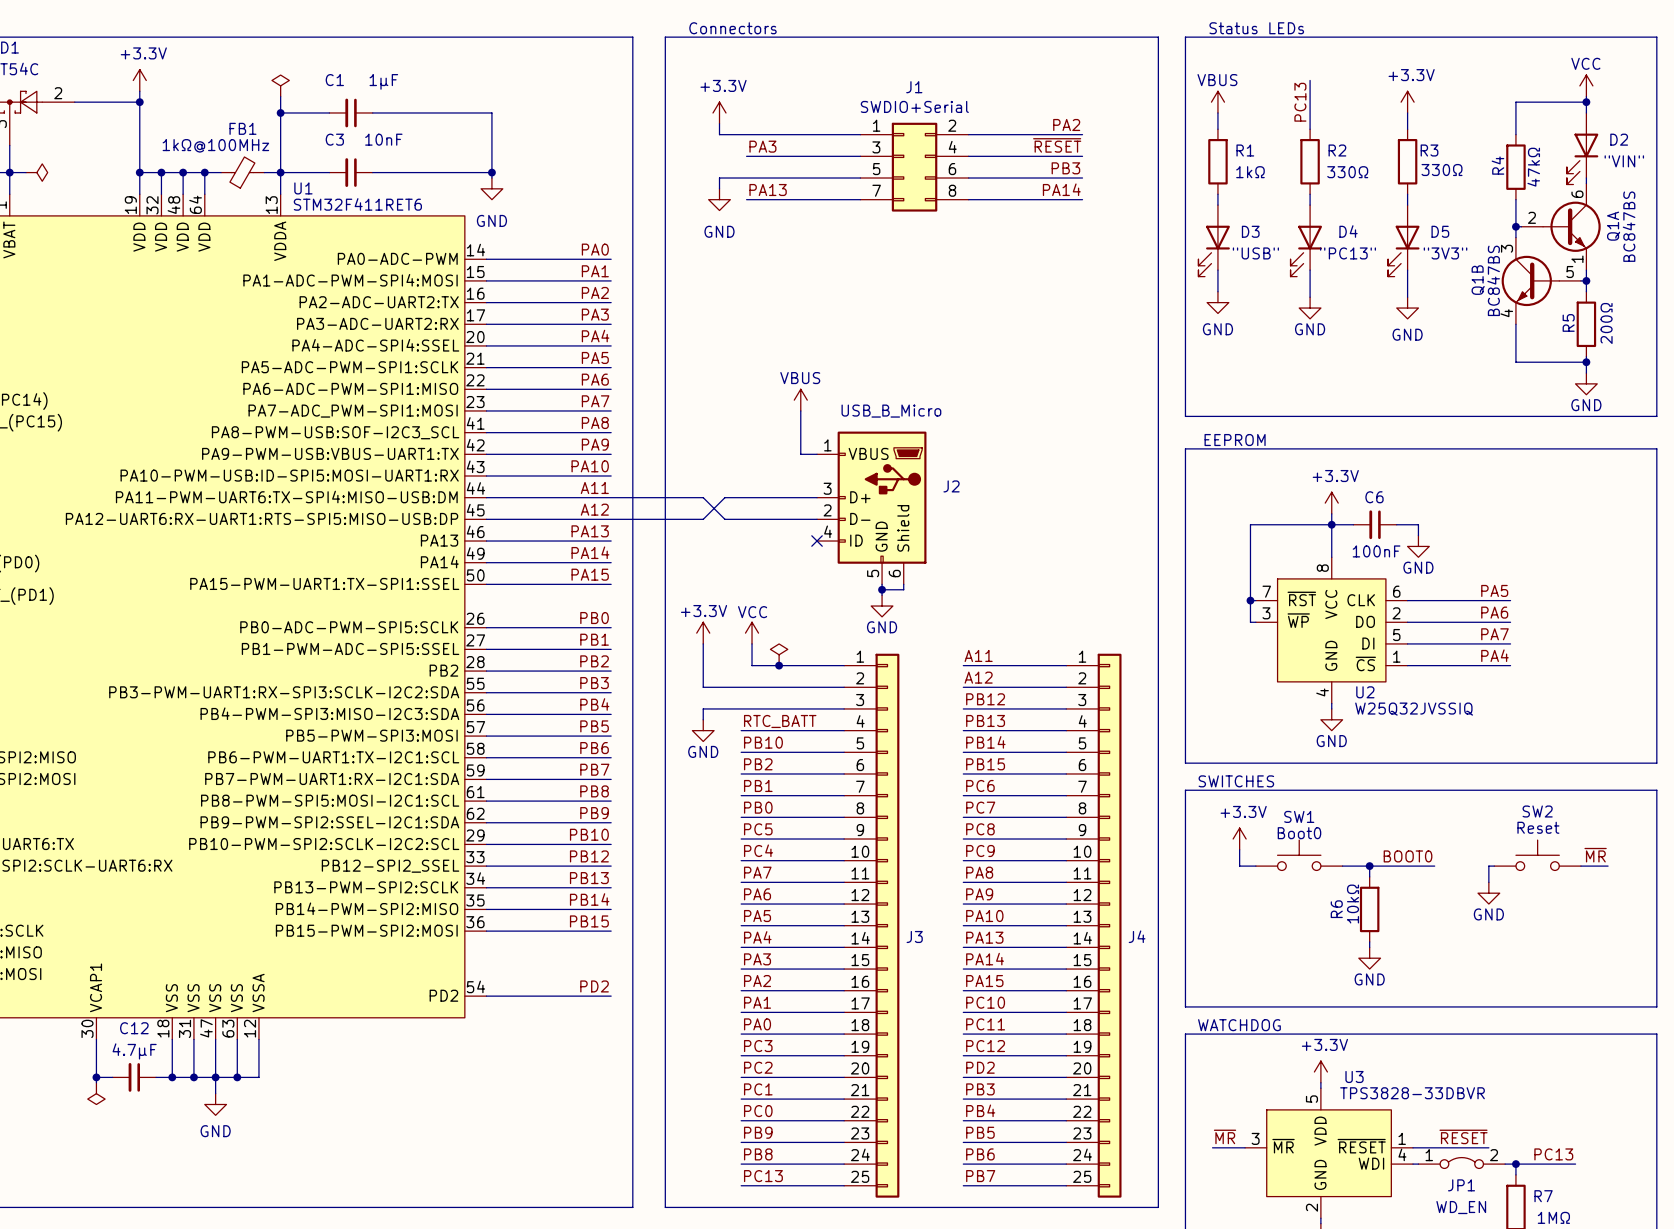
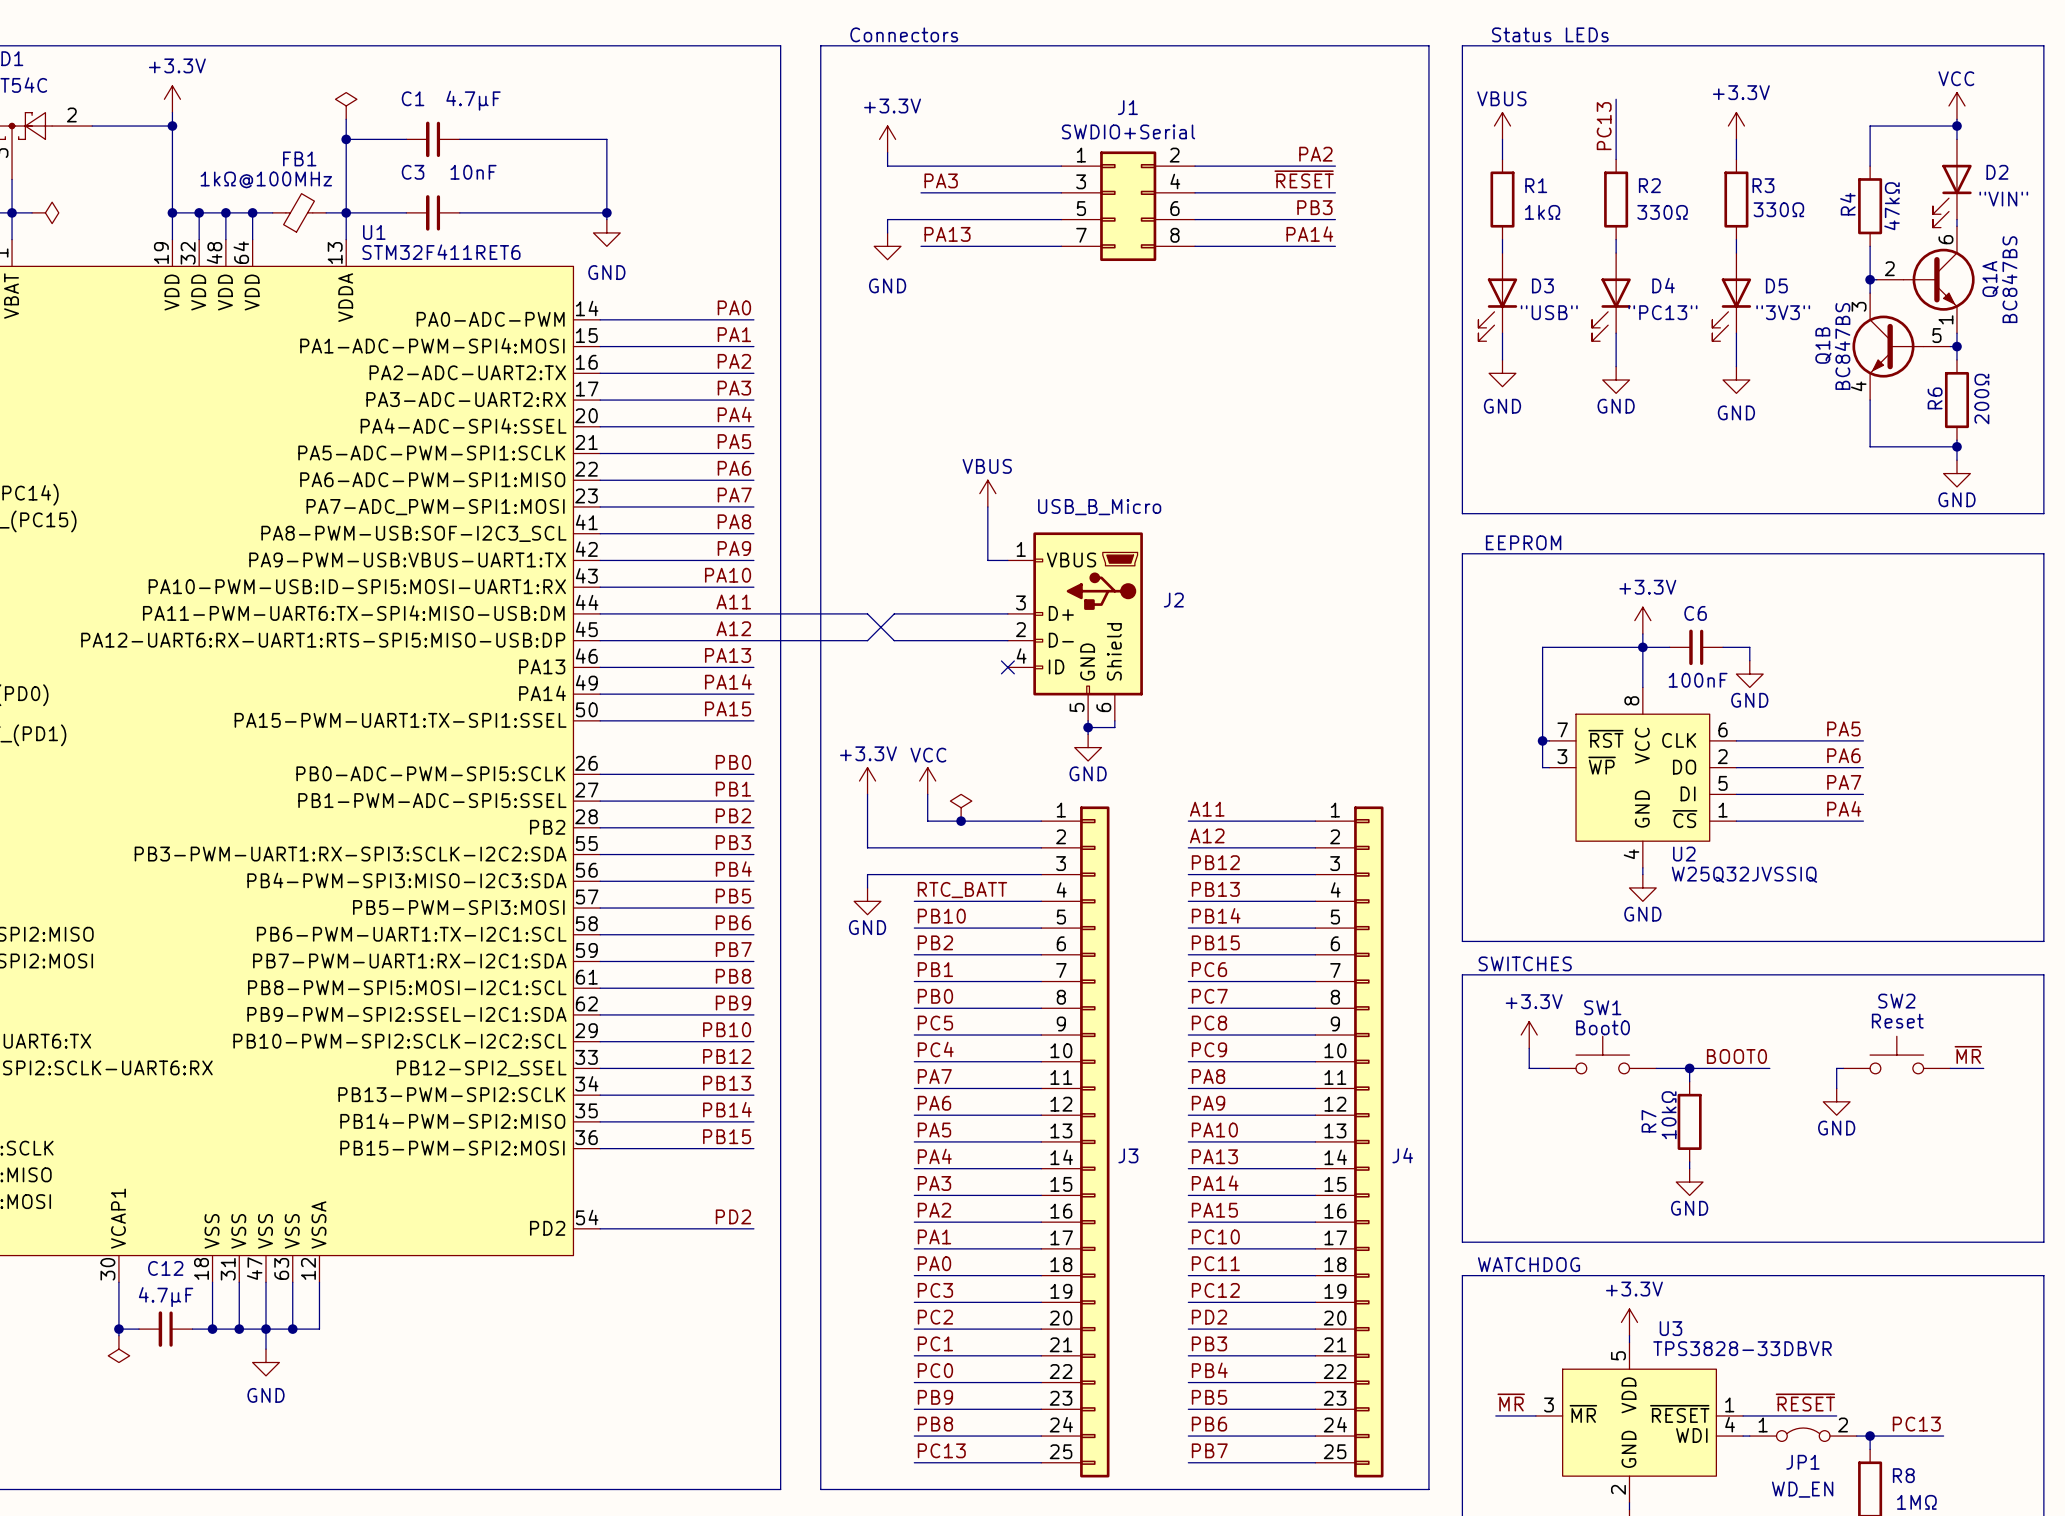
C1 value: 1µF (383, 81) -> 4.7µF (473, 100)
R5 name: R5 (1568, 322) -> R6 (1935, 398)
R6 name: R6 (1336, 909) -> R7 (1649, 1121)
R7 name: R7 (1543, 1196) -> R8 (1903, 1475)

